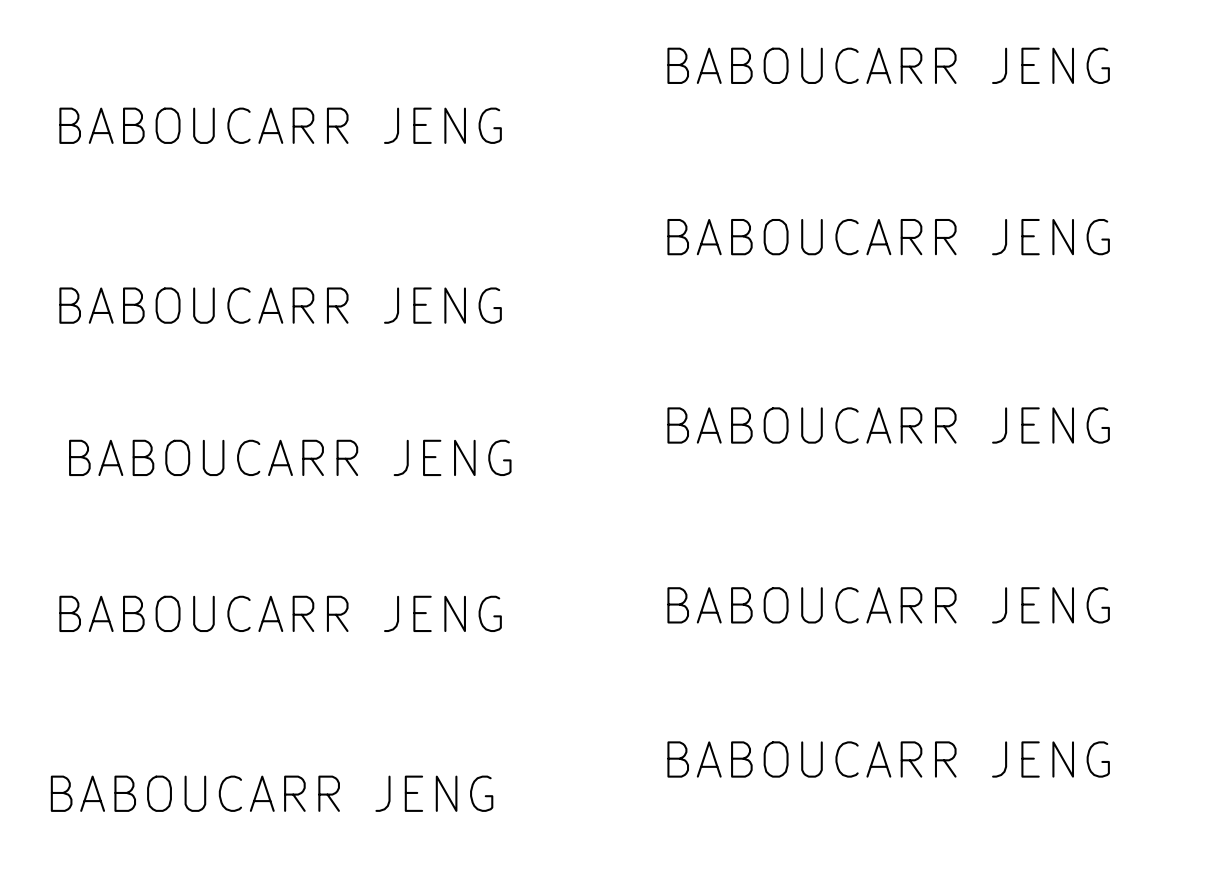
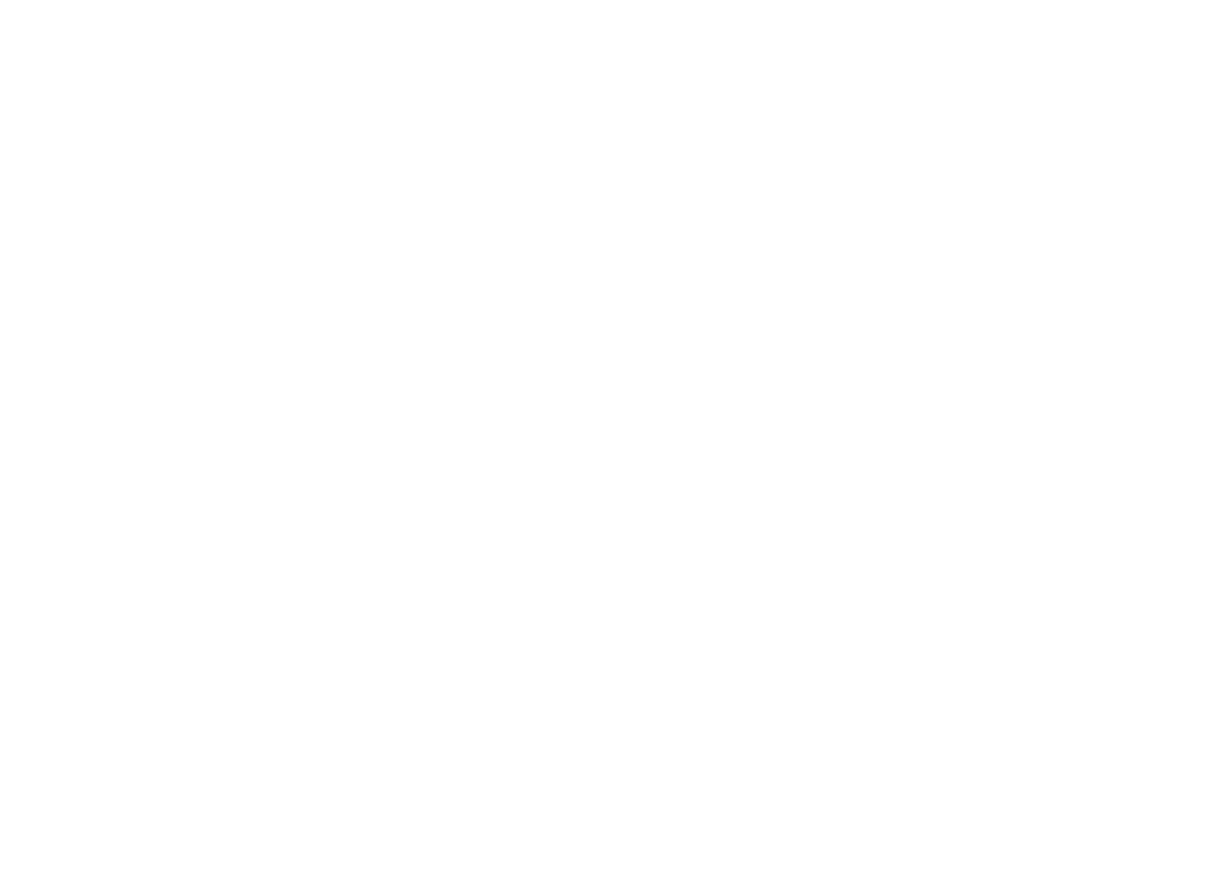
label: BABOUCARR JENG (888, 65) -> none
label: BABOUCARR JENG (280, 125) -> none
label: BABOUCARR JENG (888, 237) -> none
label: BABOUCARR JENG (280, 305) -> none
label: BABOUCARR JENG (888, 425) -> none
label: BABOUCARR JENG (290, 457) -> none
label: BABOUCARR JENG (888, 605) -> none
label: BABOUCARR JENG (280, 613) -> none
label: BABOUCARR JENG (888, 759) -> none
label: BABOUCARR JENG (272, 793) -> none

